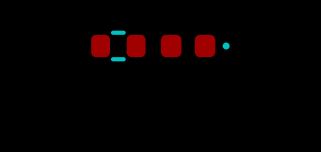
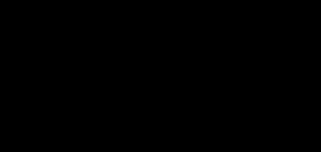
part: (118, 46) -> none
part: (195, 46) -> none

